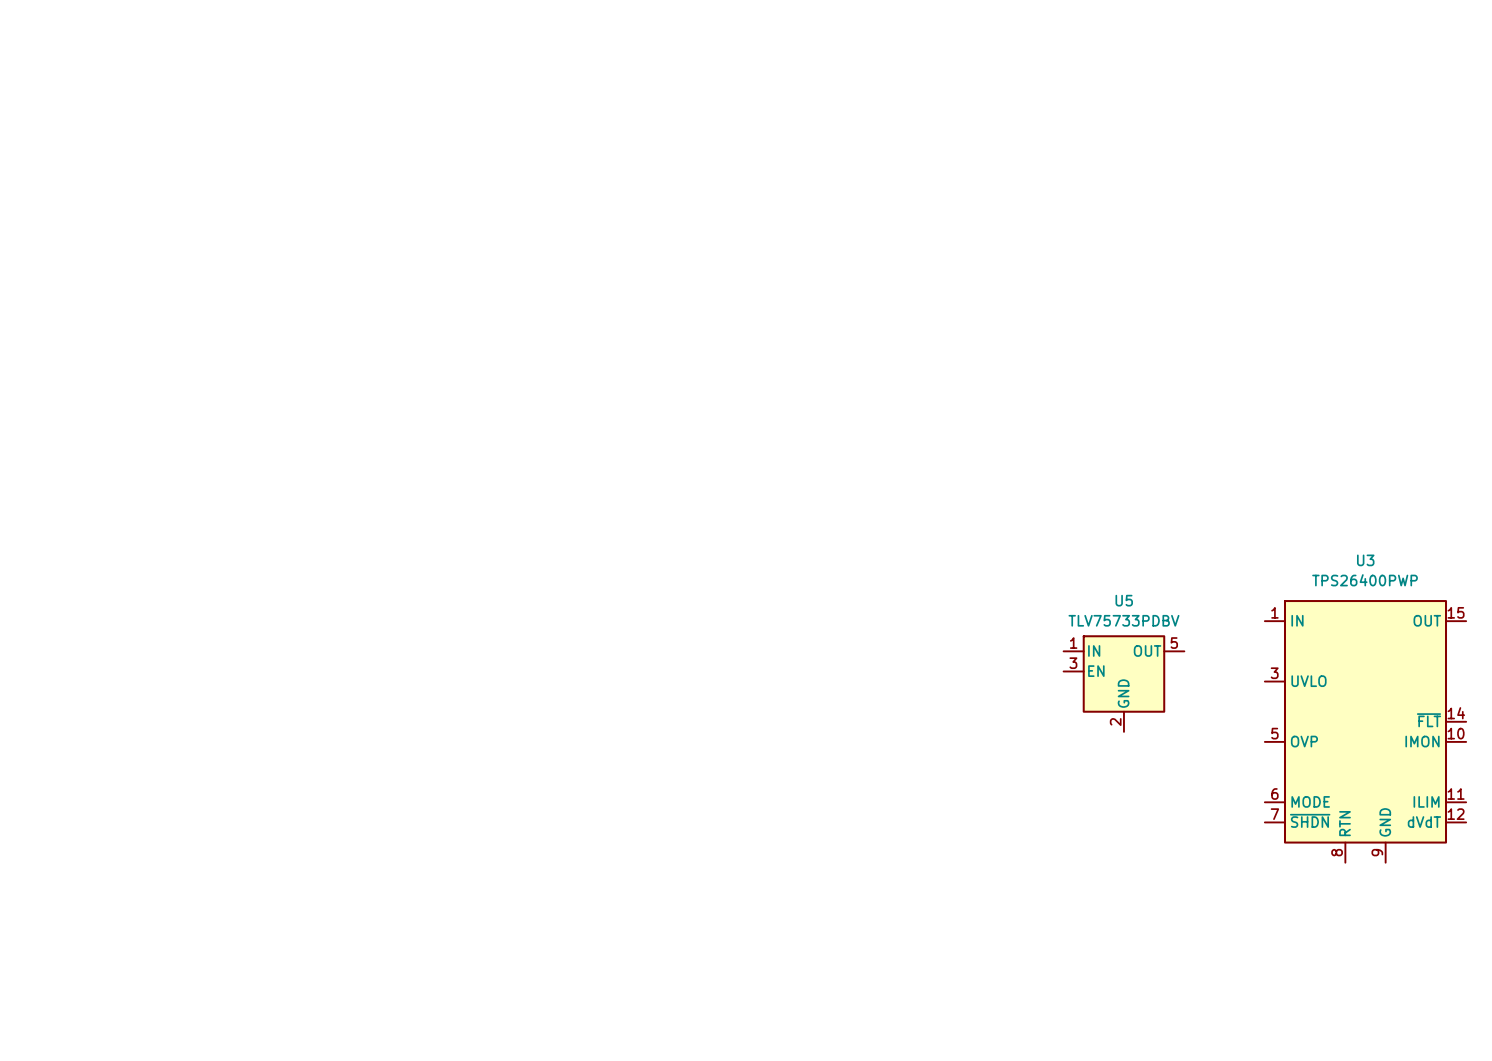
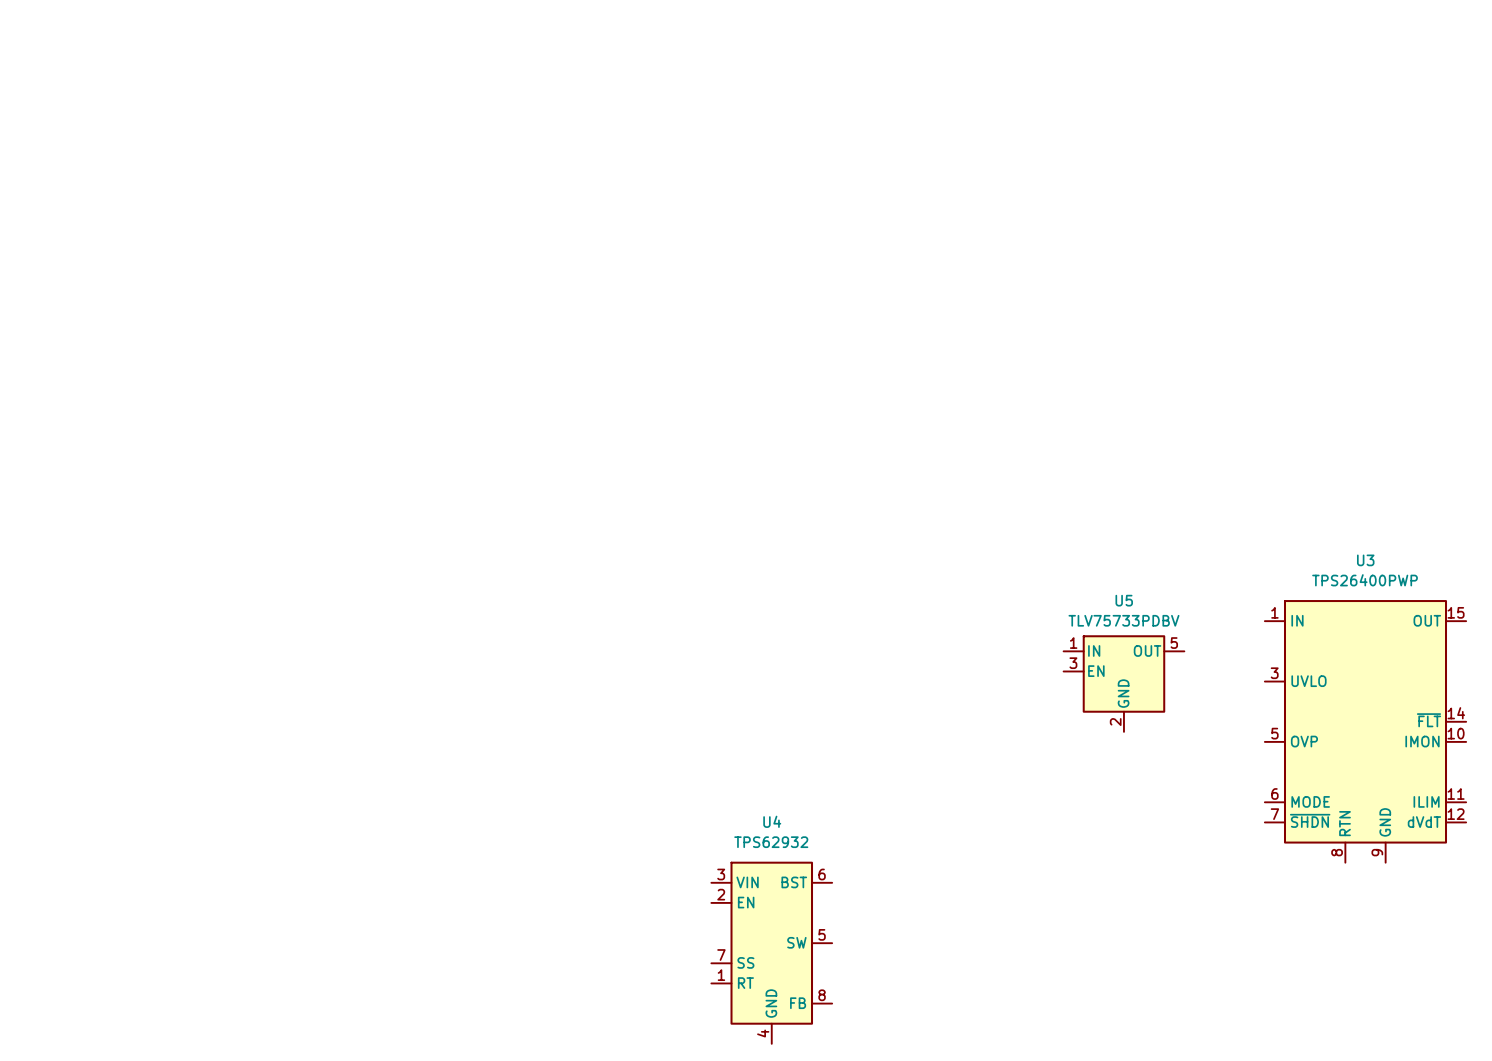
U4: none -> TPS62932 (771, 952)

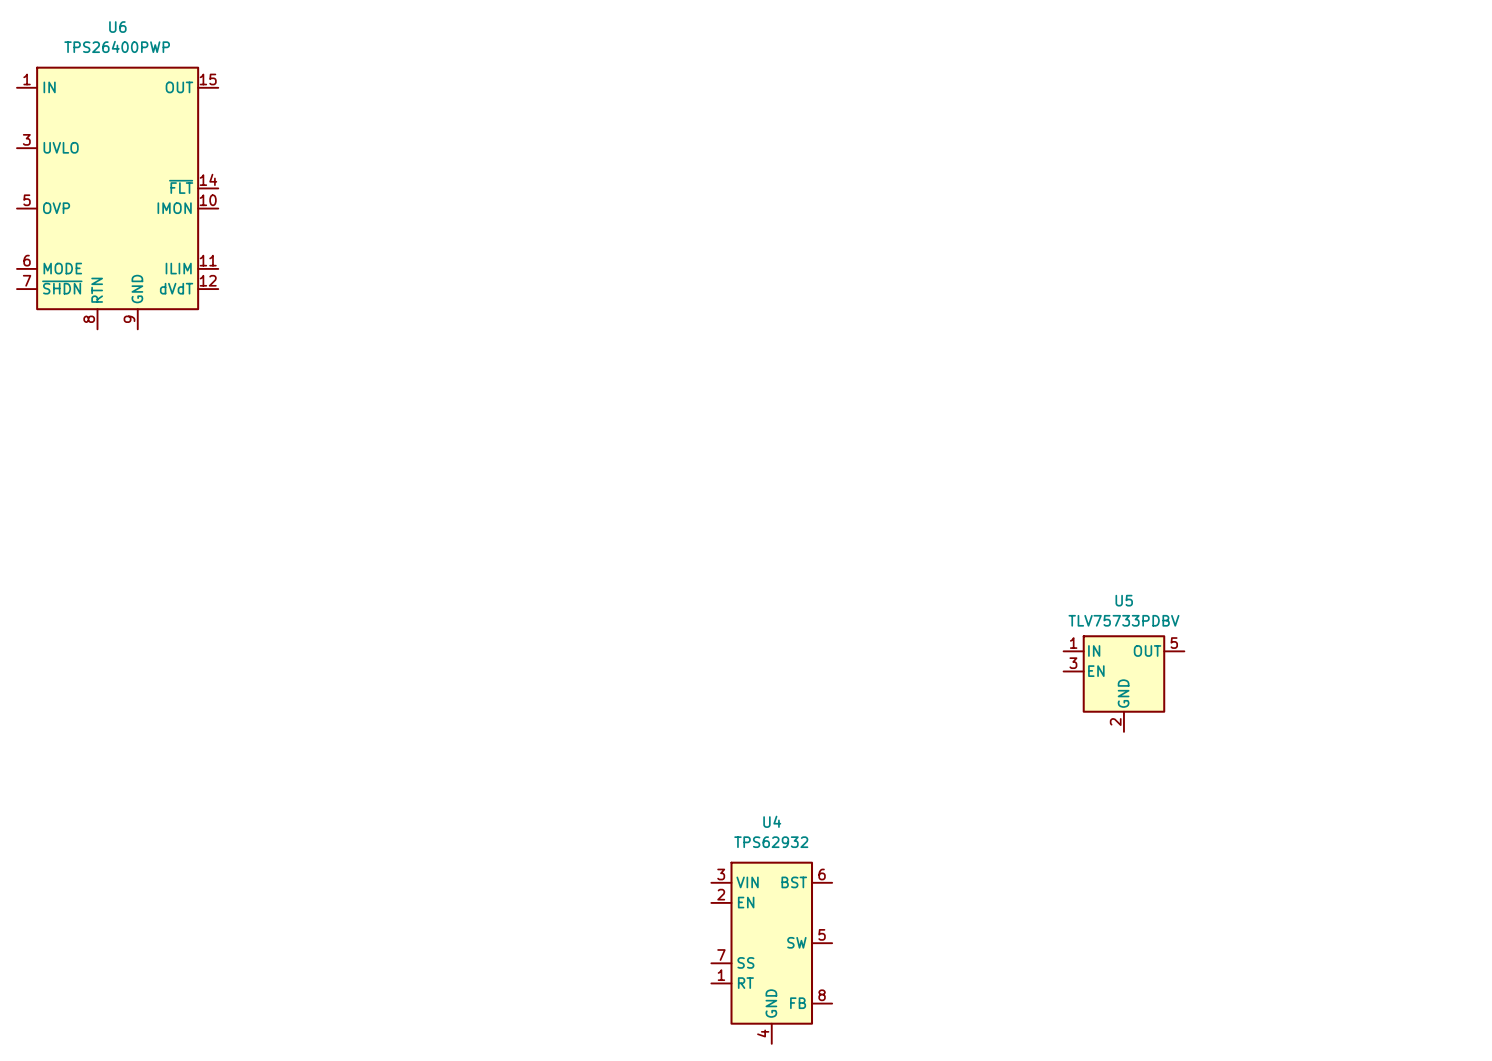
U6: none -> TPS26400PWP (117, 197)
U3: TPS26400PWP (1365, 731) -> none

